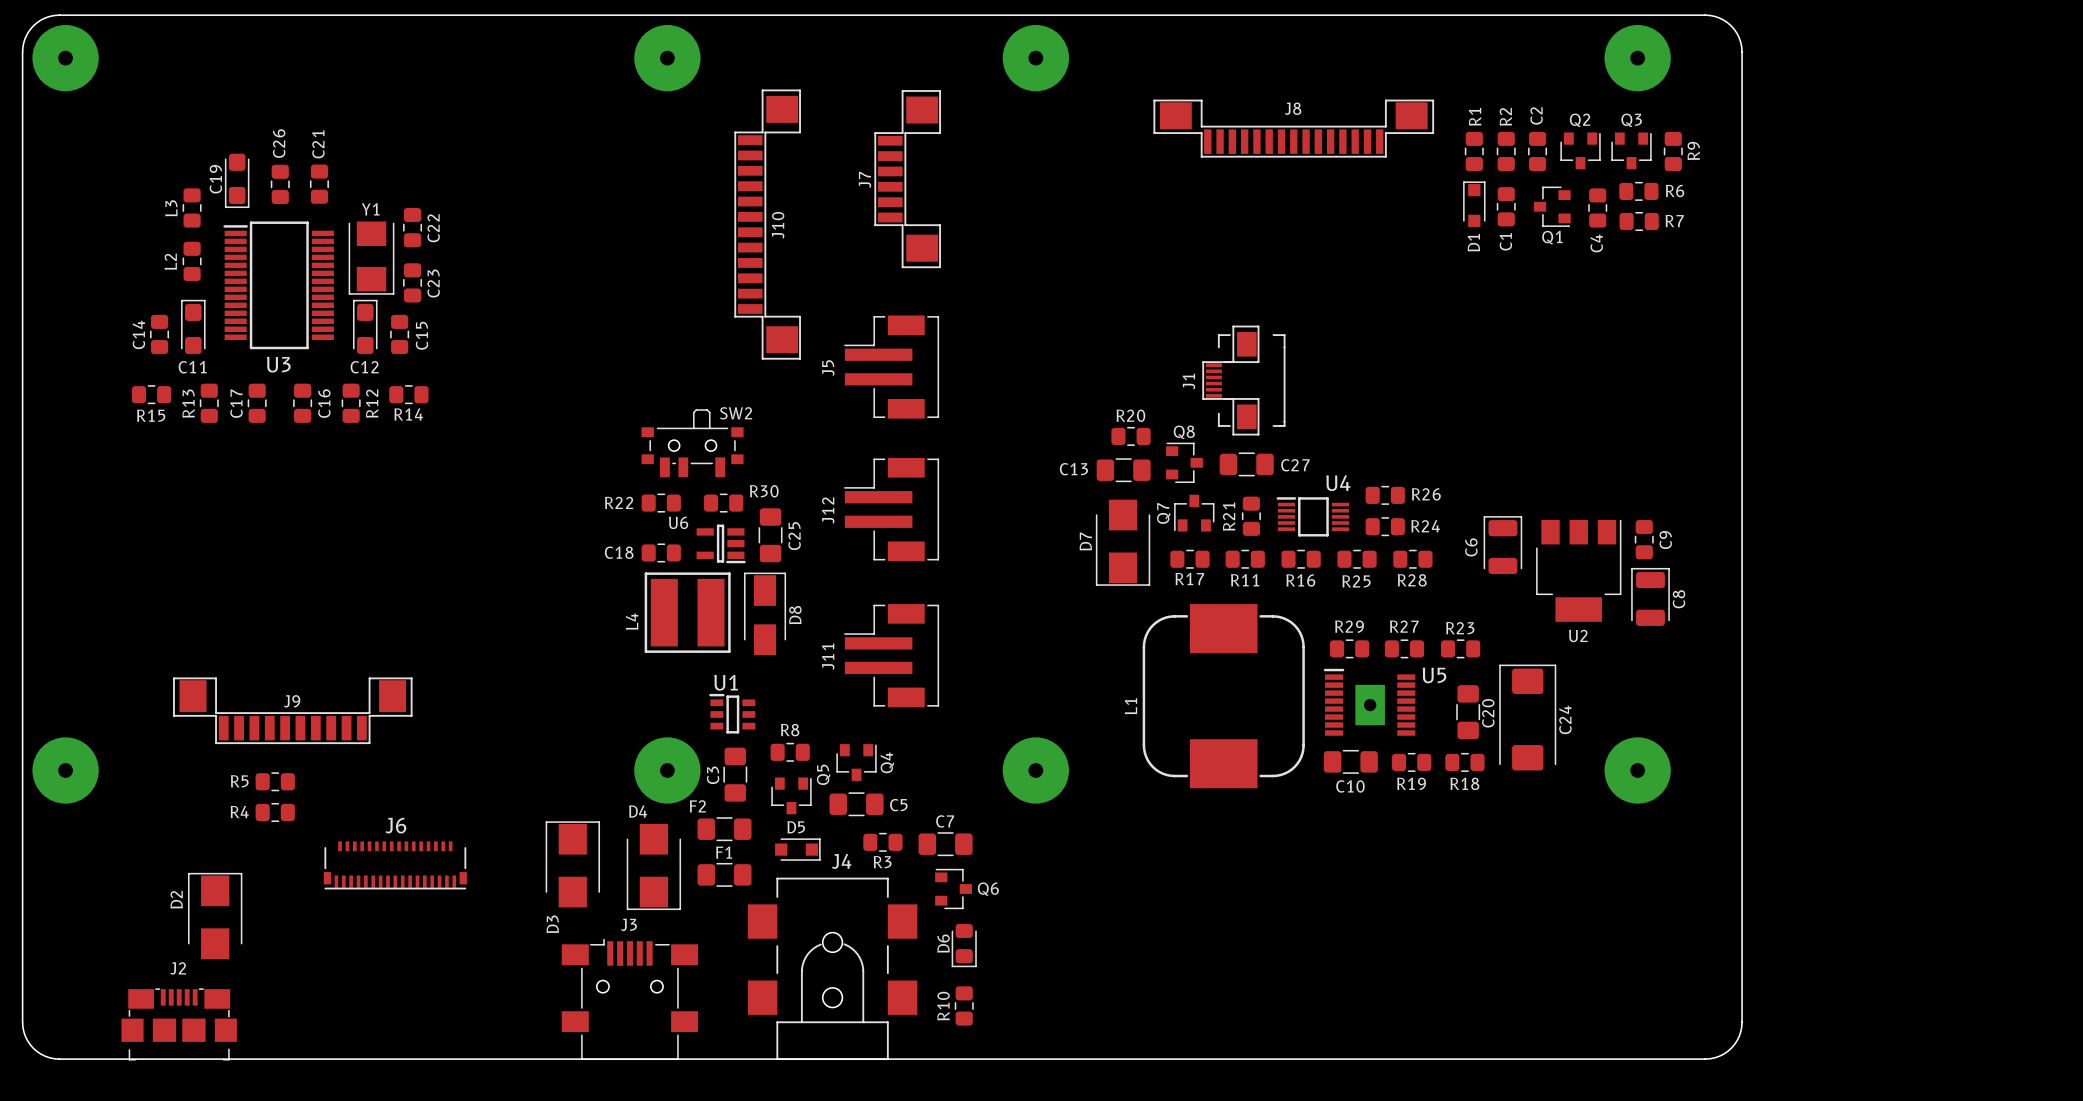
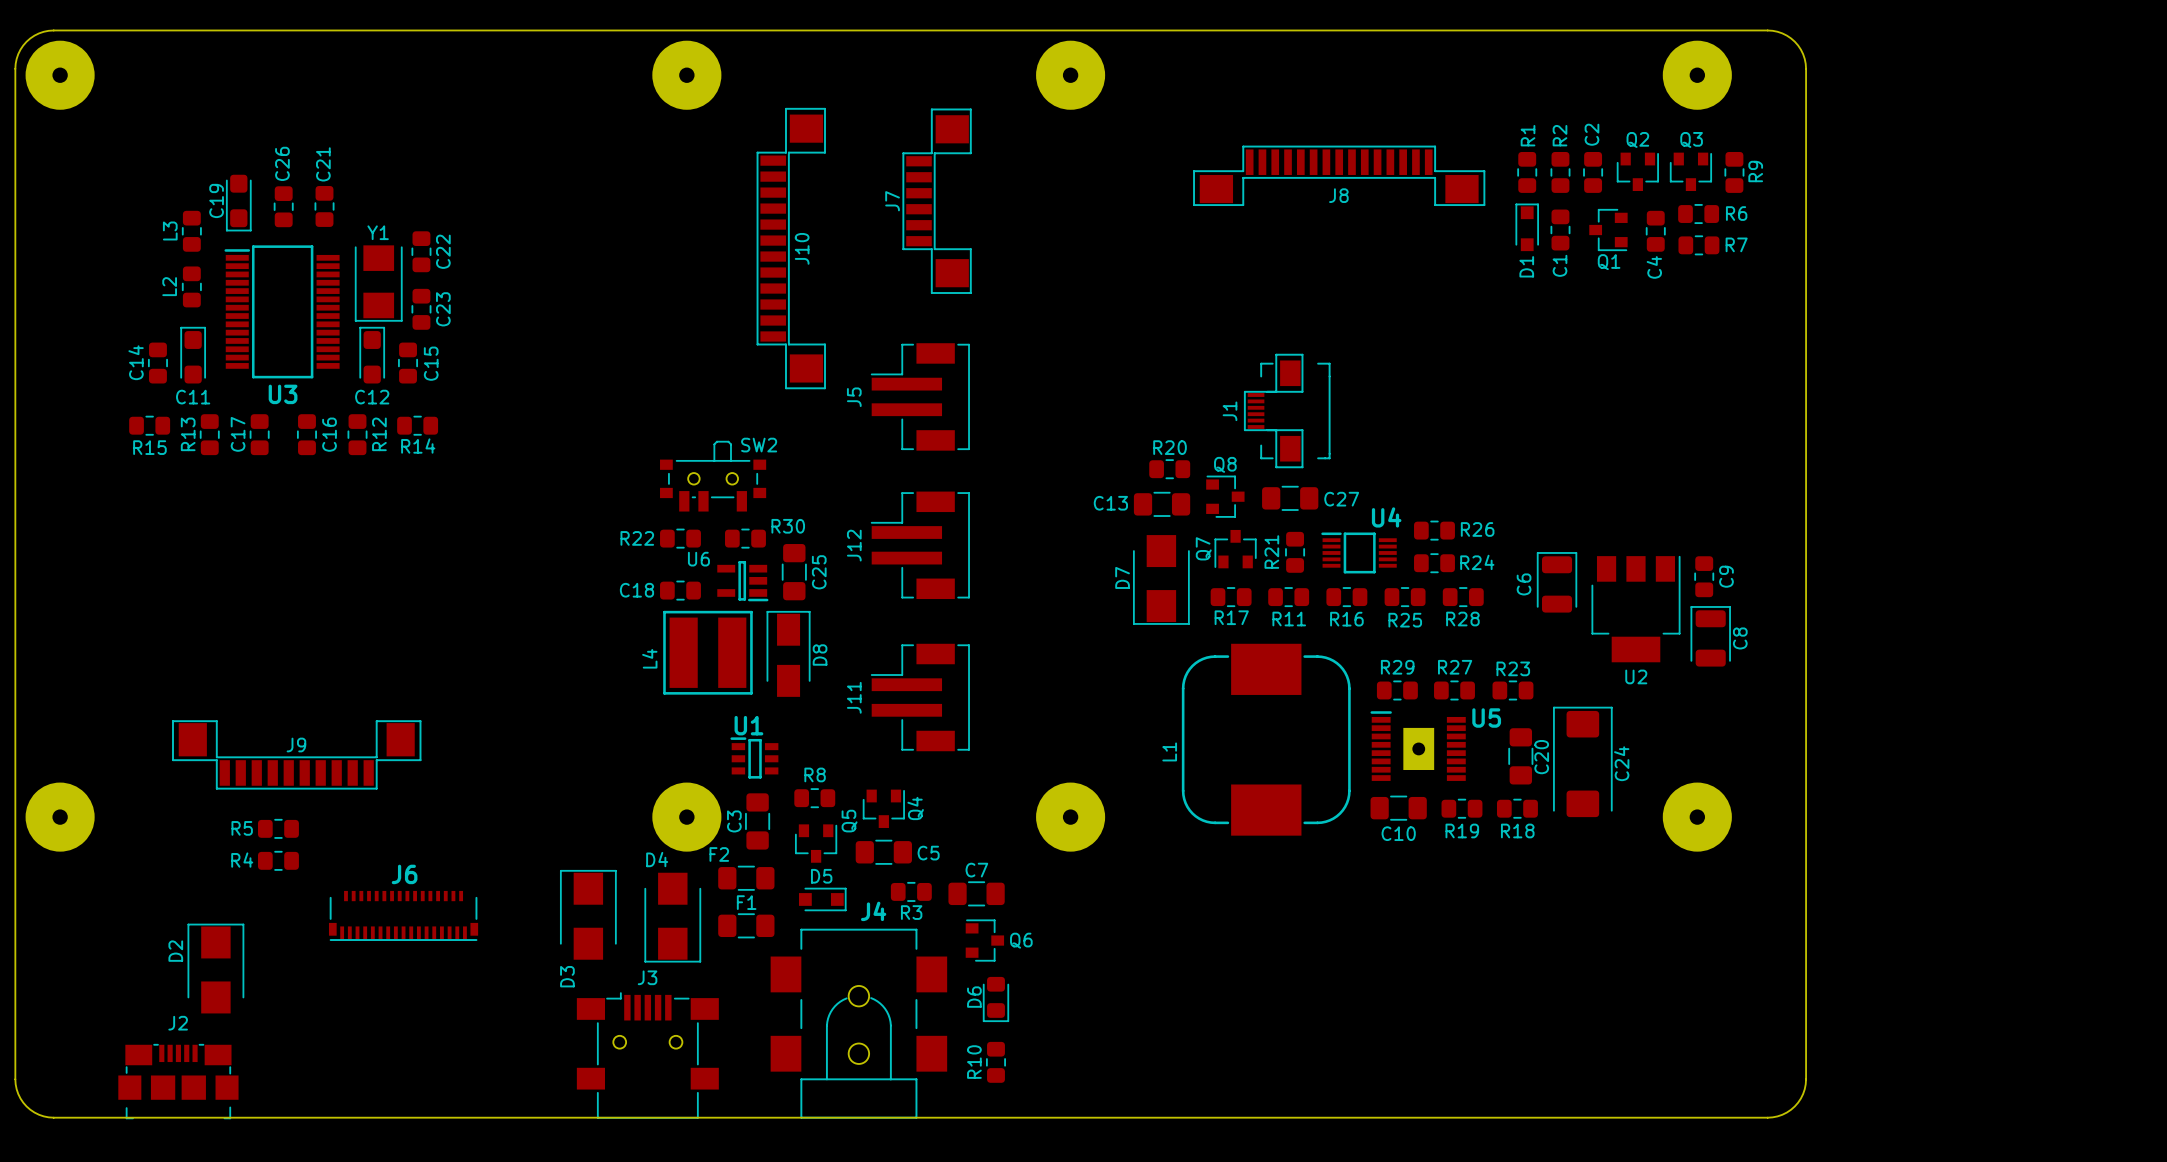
J8 rotation: 0° (1293, 128) -> 180° (1339, 175)

